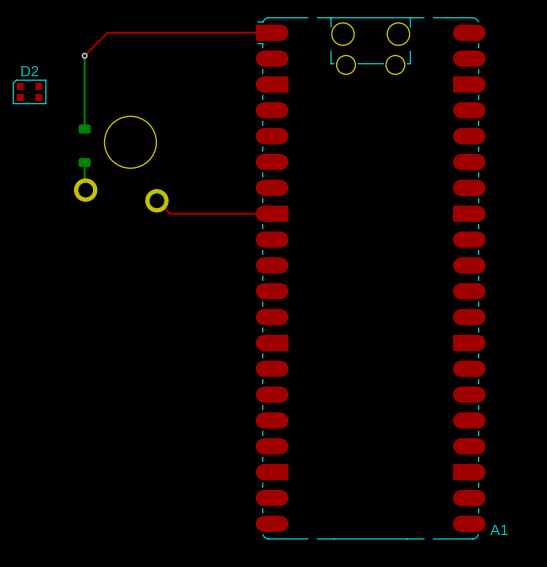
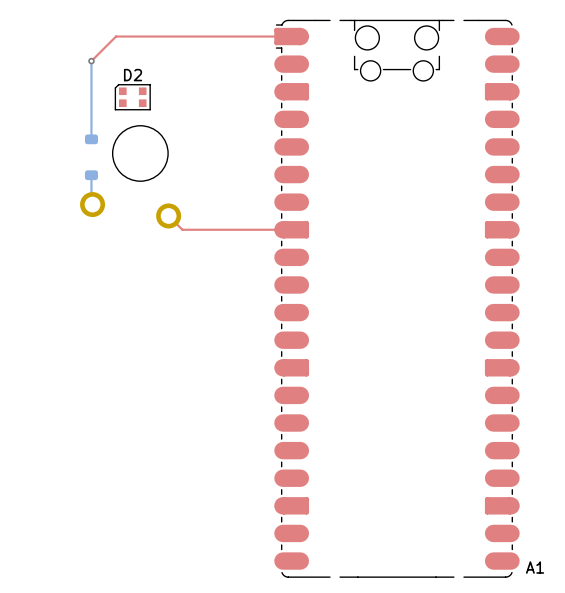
D2 position: (29, 91) -> (132, 97)

